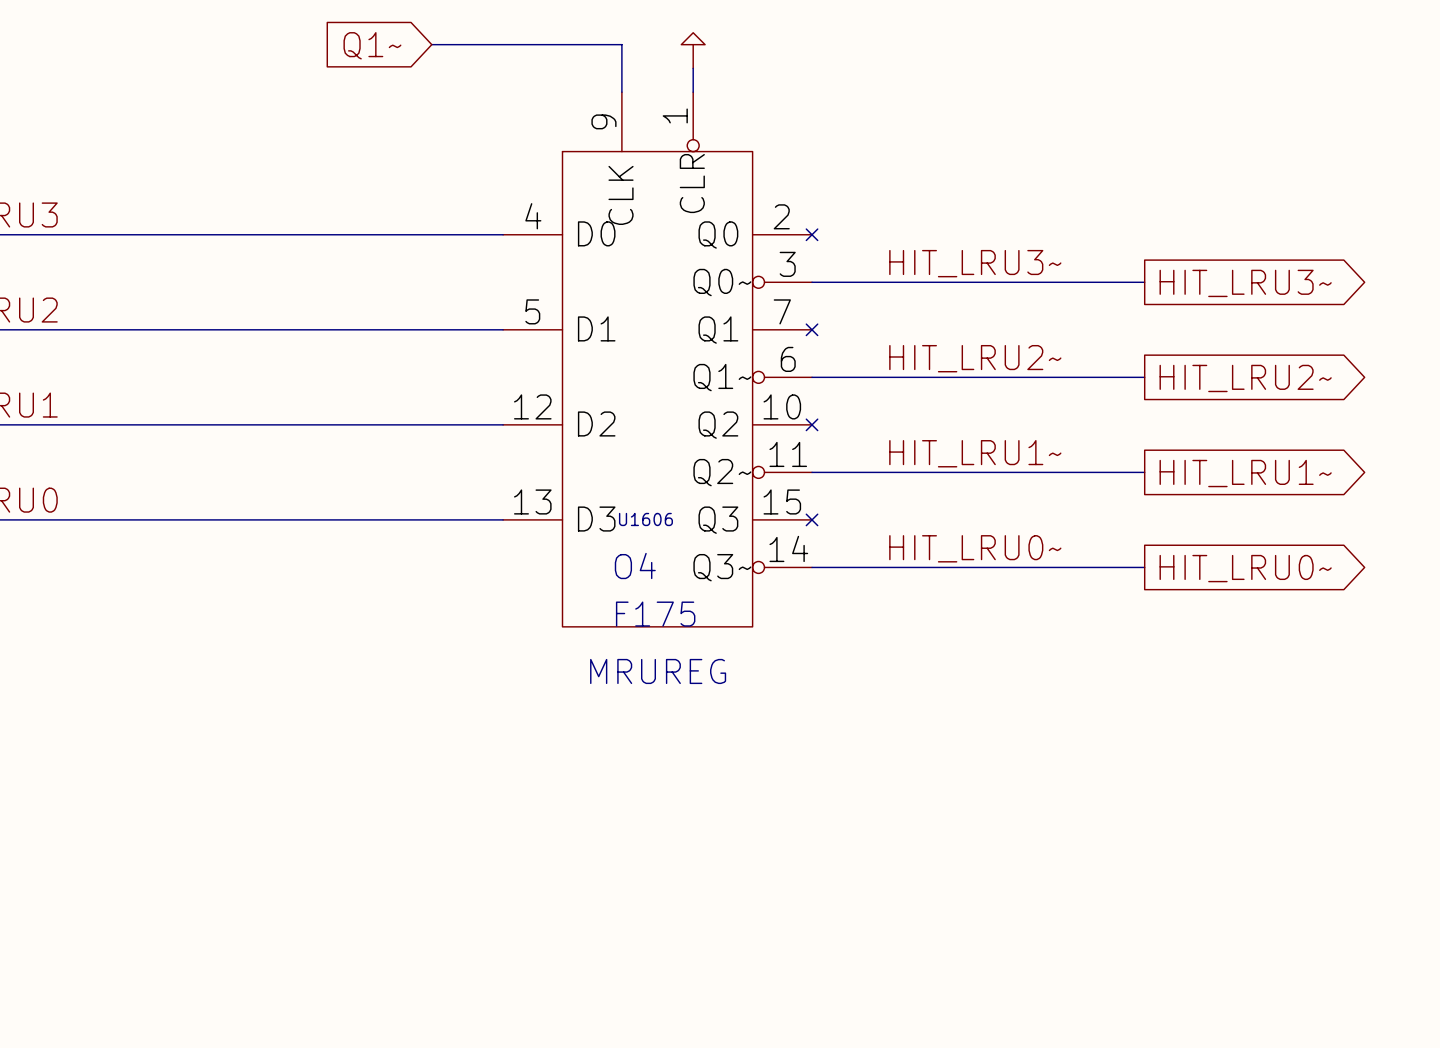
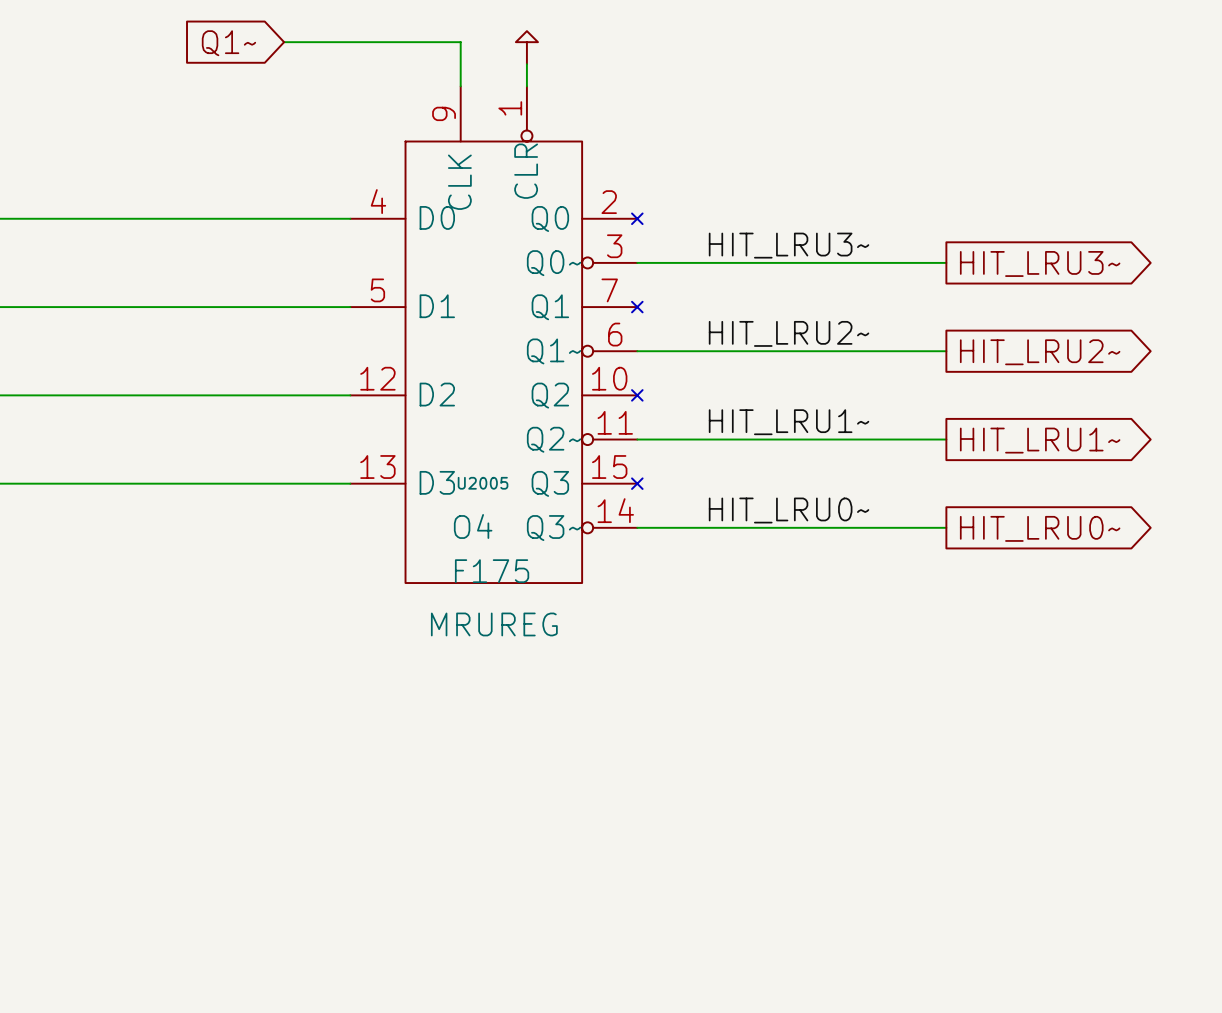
U1606 name: U1606 (645, 519) -> U2005 (483, 483)

